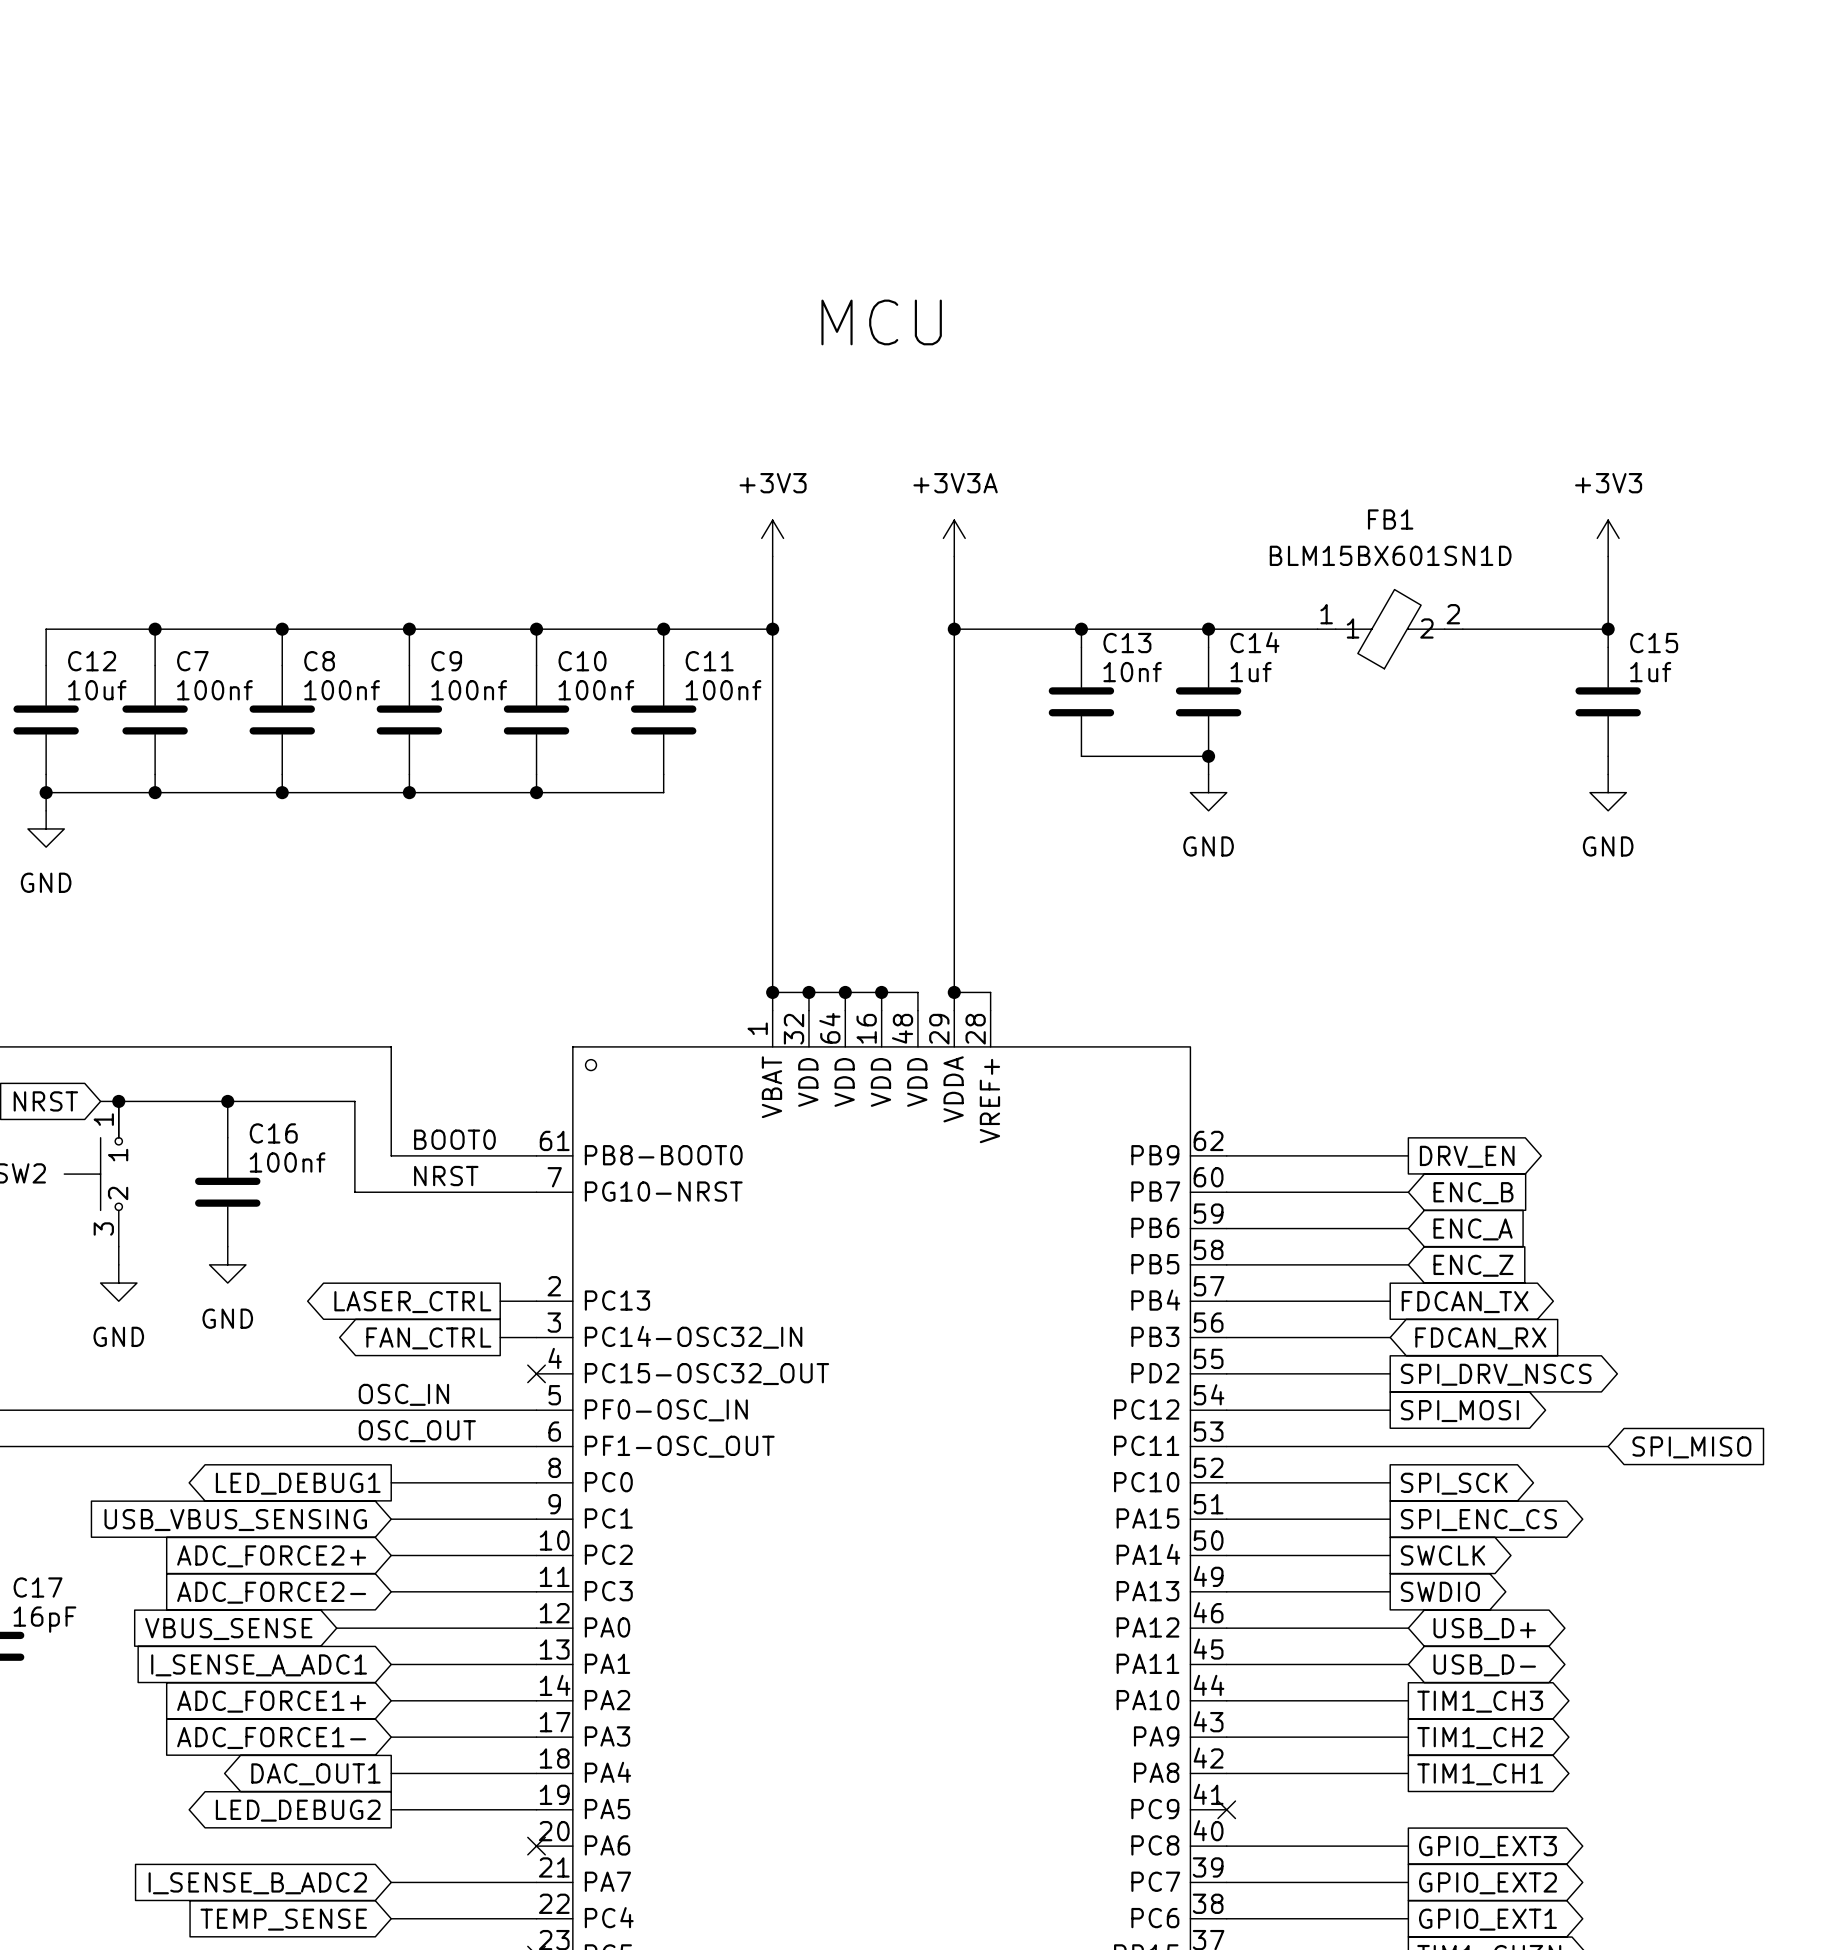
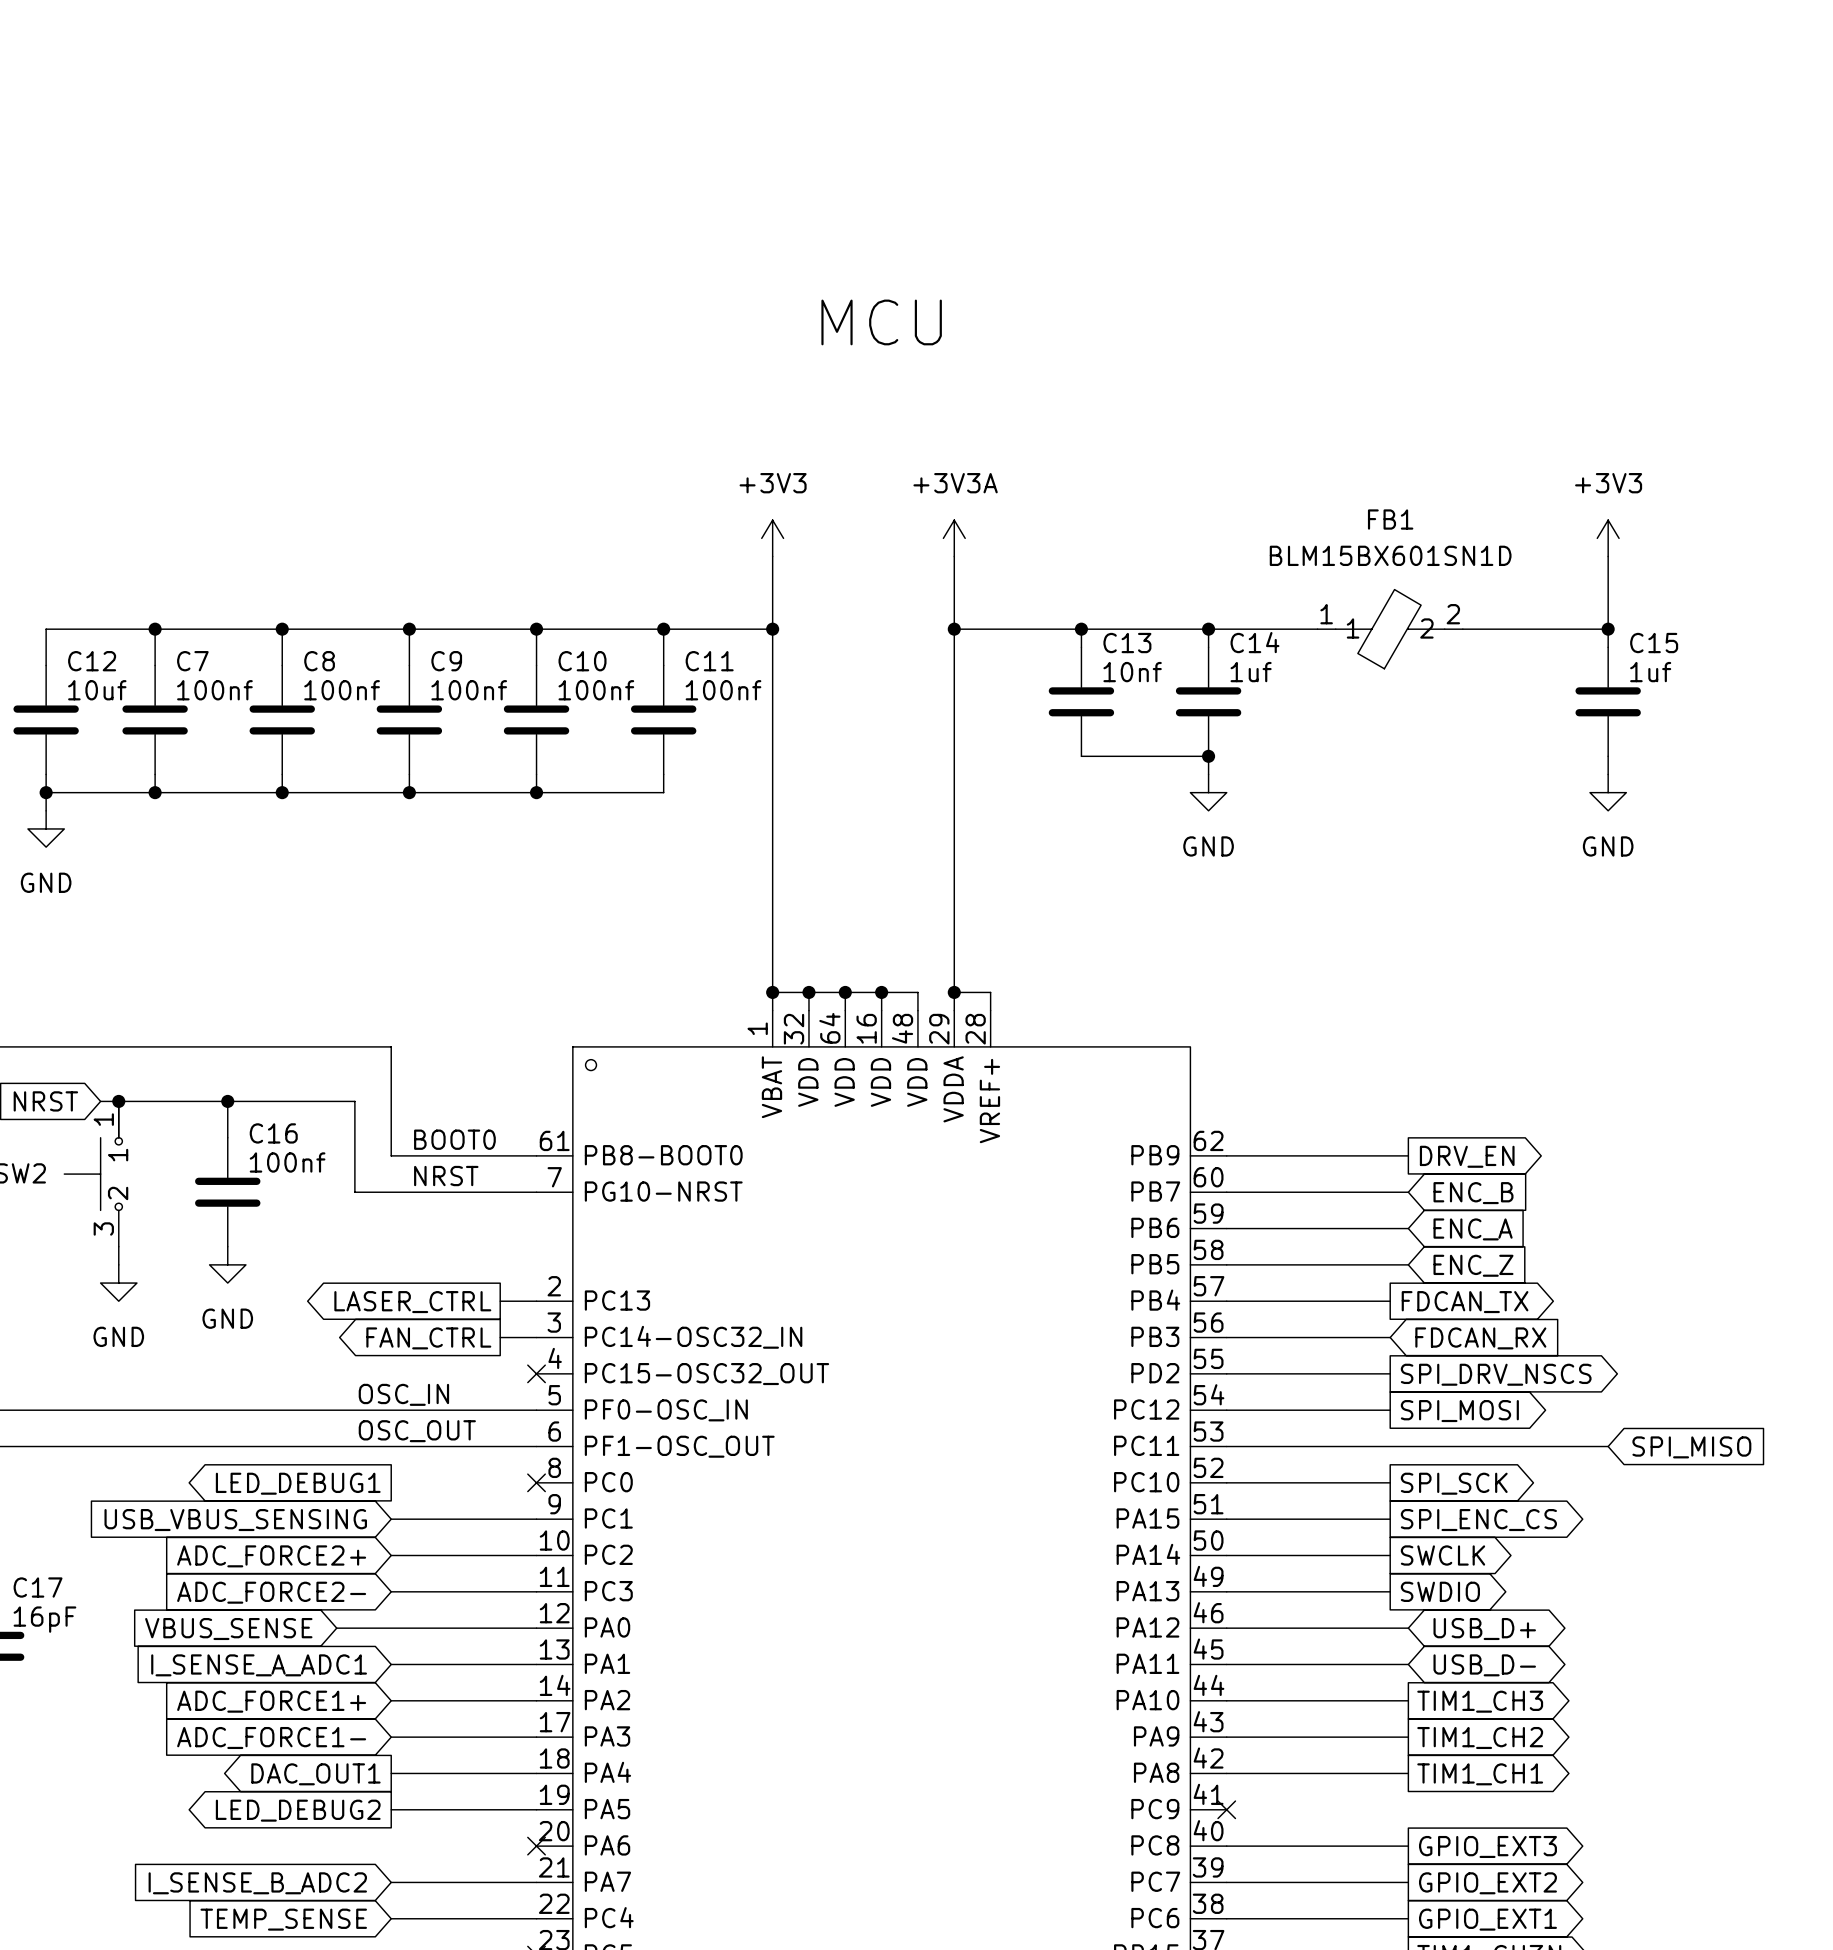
wire: (391, 1482) (536, 1482) -> none
no-connect mark: none -> (536, 1482)

